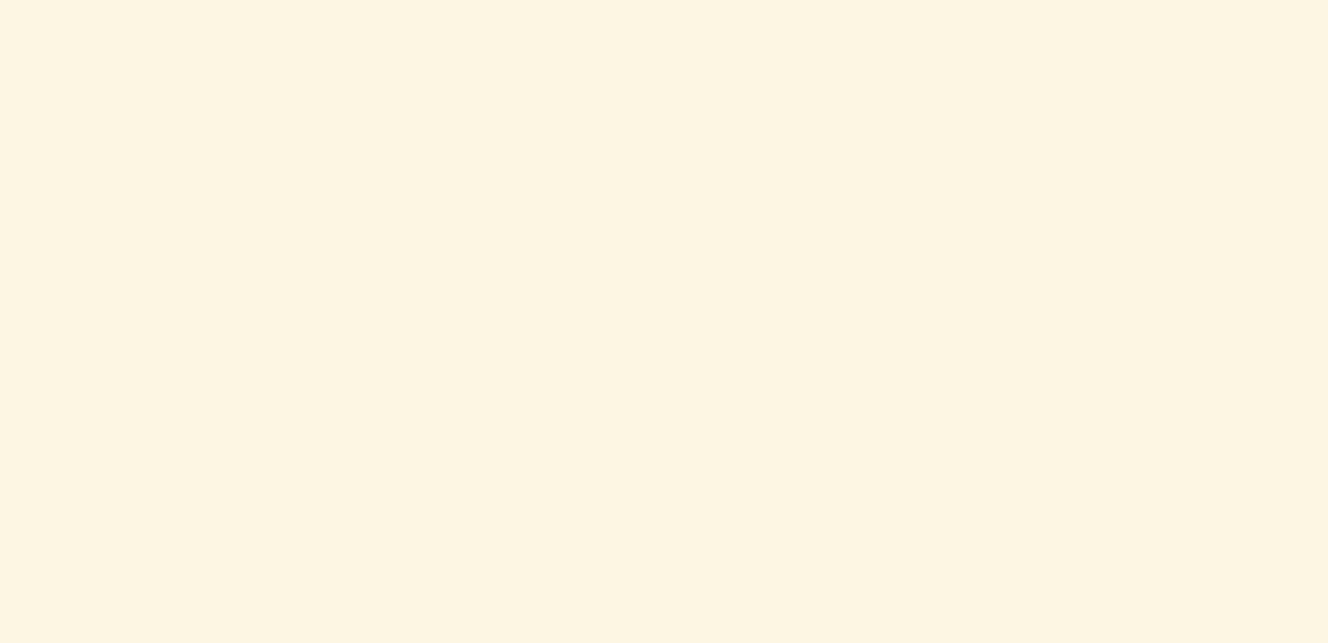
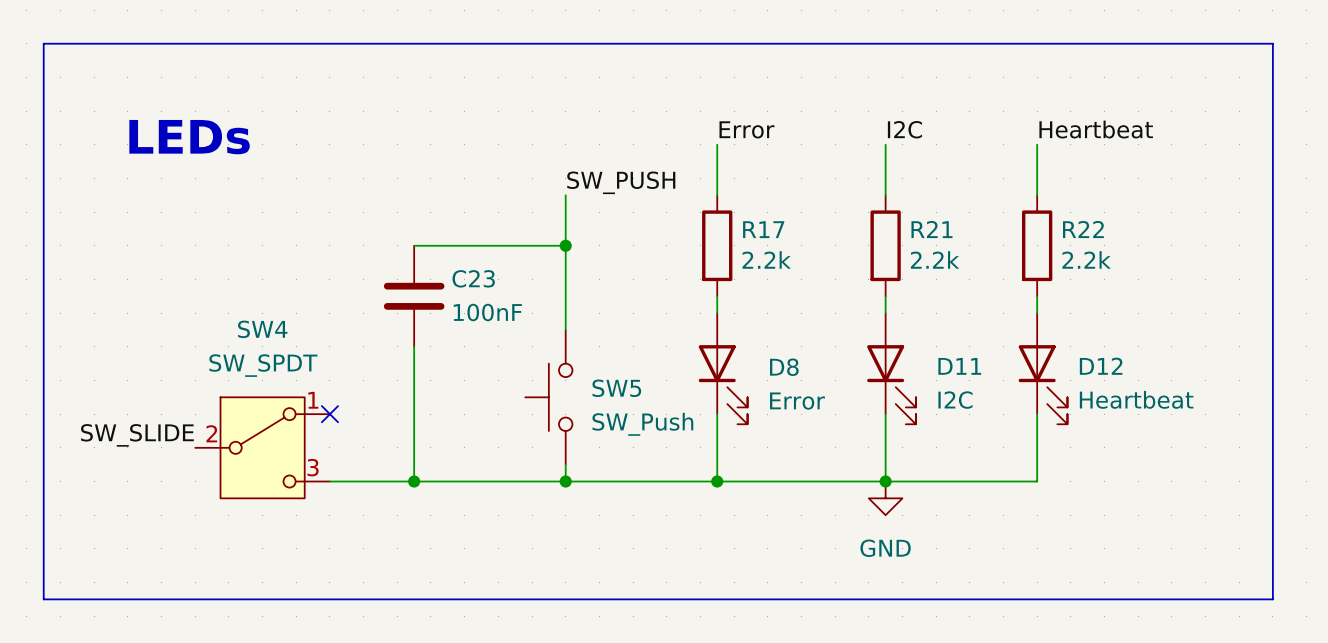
line: none -> (43, 43) (1272, 43) (1272, 599) (43, 599) (43, 43)
label: none -> Error (746, 129)
label: none -> I2C (904, 129)
label: none -> Heartbeat (1096, 129)
text: none -> LEDs (189, 137)
wire: none -> (717, 144) (717, 195)
wire: none -> (885, 144) (885, 195)
wire: none -> (1037, 144) (1037, 195)
label: none -> SW_PUSH (621, 182)
wire: none -> (565, 195) (565, 329)
wire: none -> (414, 245) (565, 245)
junction: none -> (565, 245)
R17: none -> 2.2k (717, 245)
R21: none -> 2.2k (885, 245)
R22: none -> 2.2k (1037, 245)
C23: none -> 100nF (414, 296)
wire: none -> (717, 296) (717, 313)
wire: none -> (885, 296) (885, 313)
wire: none -> (1037, 296) (1037, 313)
wire: none -> (414, 346) (414, 481)
D8: none -> Error (723, 368)
D11: none -> I2C (891, 368)
D12: none -> Heartbeat (1043, 368)
SW5: none -> SW_Push (548, 397)
no-connect mark: none -> (329, 414)
wire: none -> (717, 414) (717, 481)
wire: none -> (885, 414) (885, 481)
wire: none -> (1037, 414) (1037, 481) (329, 481)
label: none -> SW_SLIDE (137, 435)
SW4: none -> SW_SPDT (262, 447)
wire: none -> (565, 464) (565, 481)
junction: none -> (414, 481)
junction: none -> (565, 481)
junction: none -> (717, 481)
junction: none -> (885, 481)
power symbol: none -> GND (885, 498)

